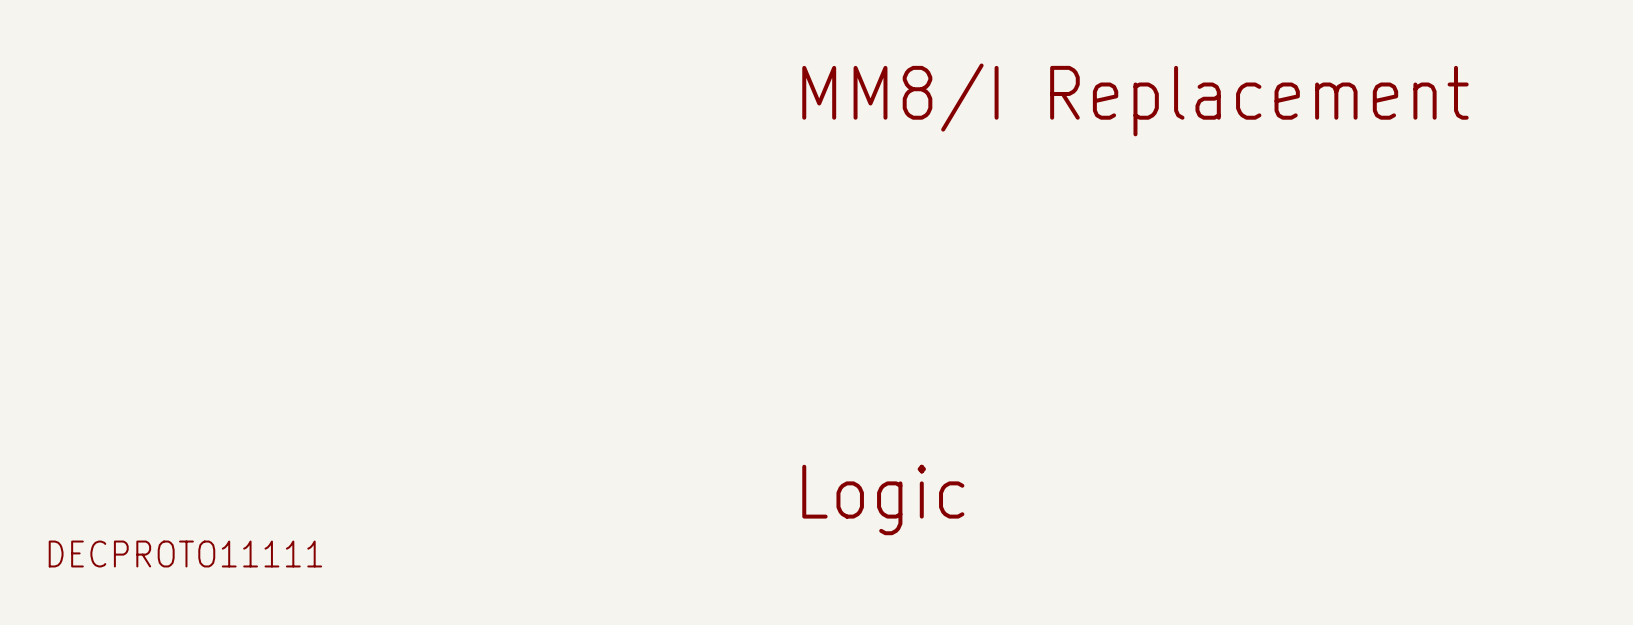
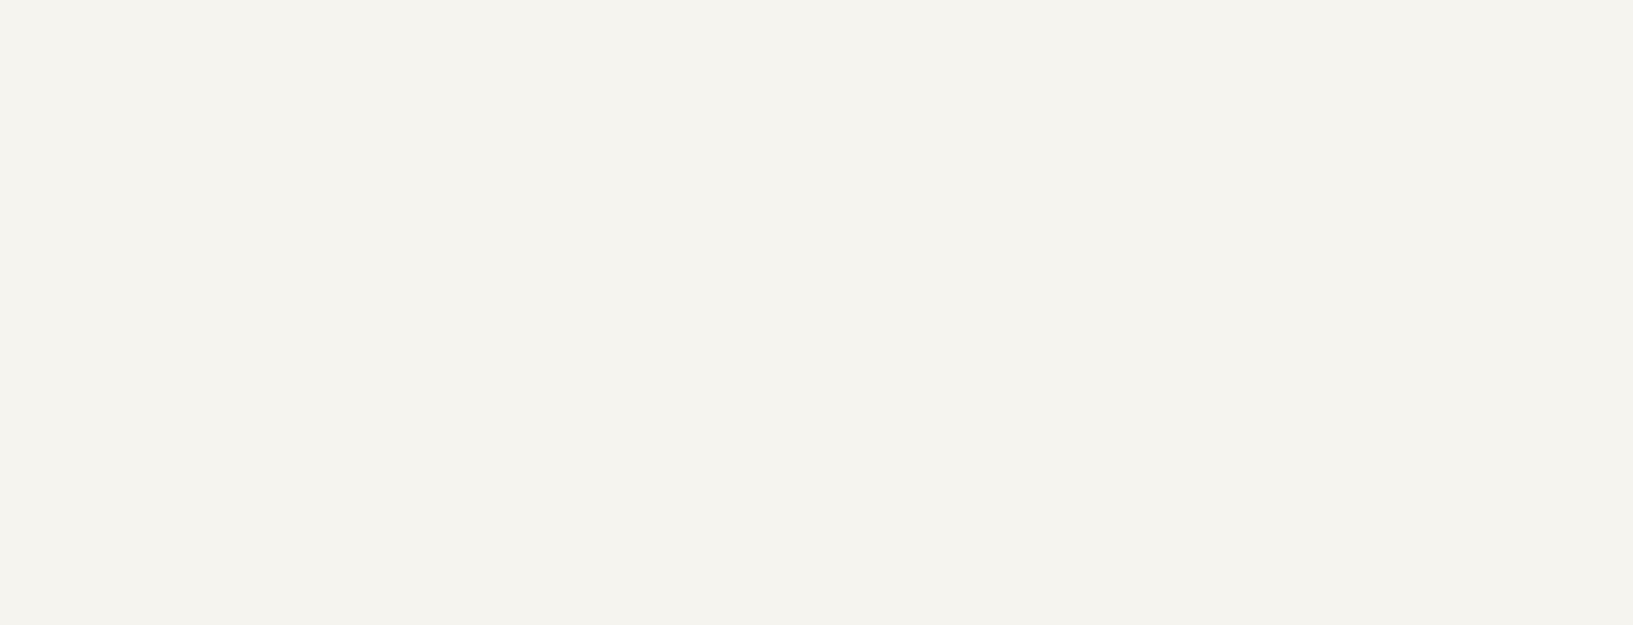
text: MM8/I Replacement (1135, 99) -> none
text: Logic (883, 499) -> none
part: DECPROTO11111 (185, 554) -> none

